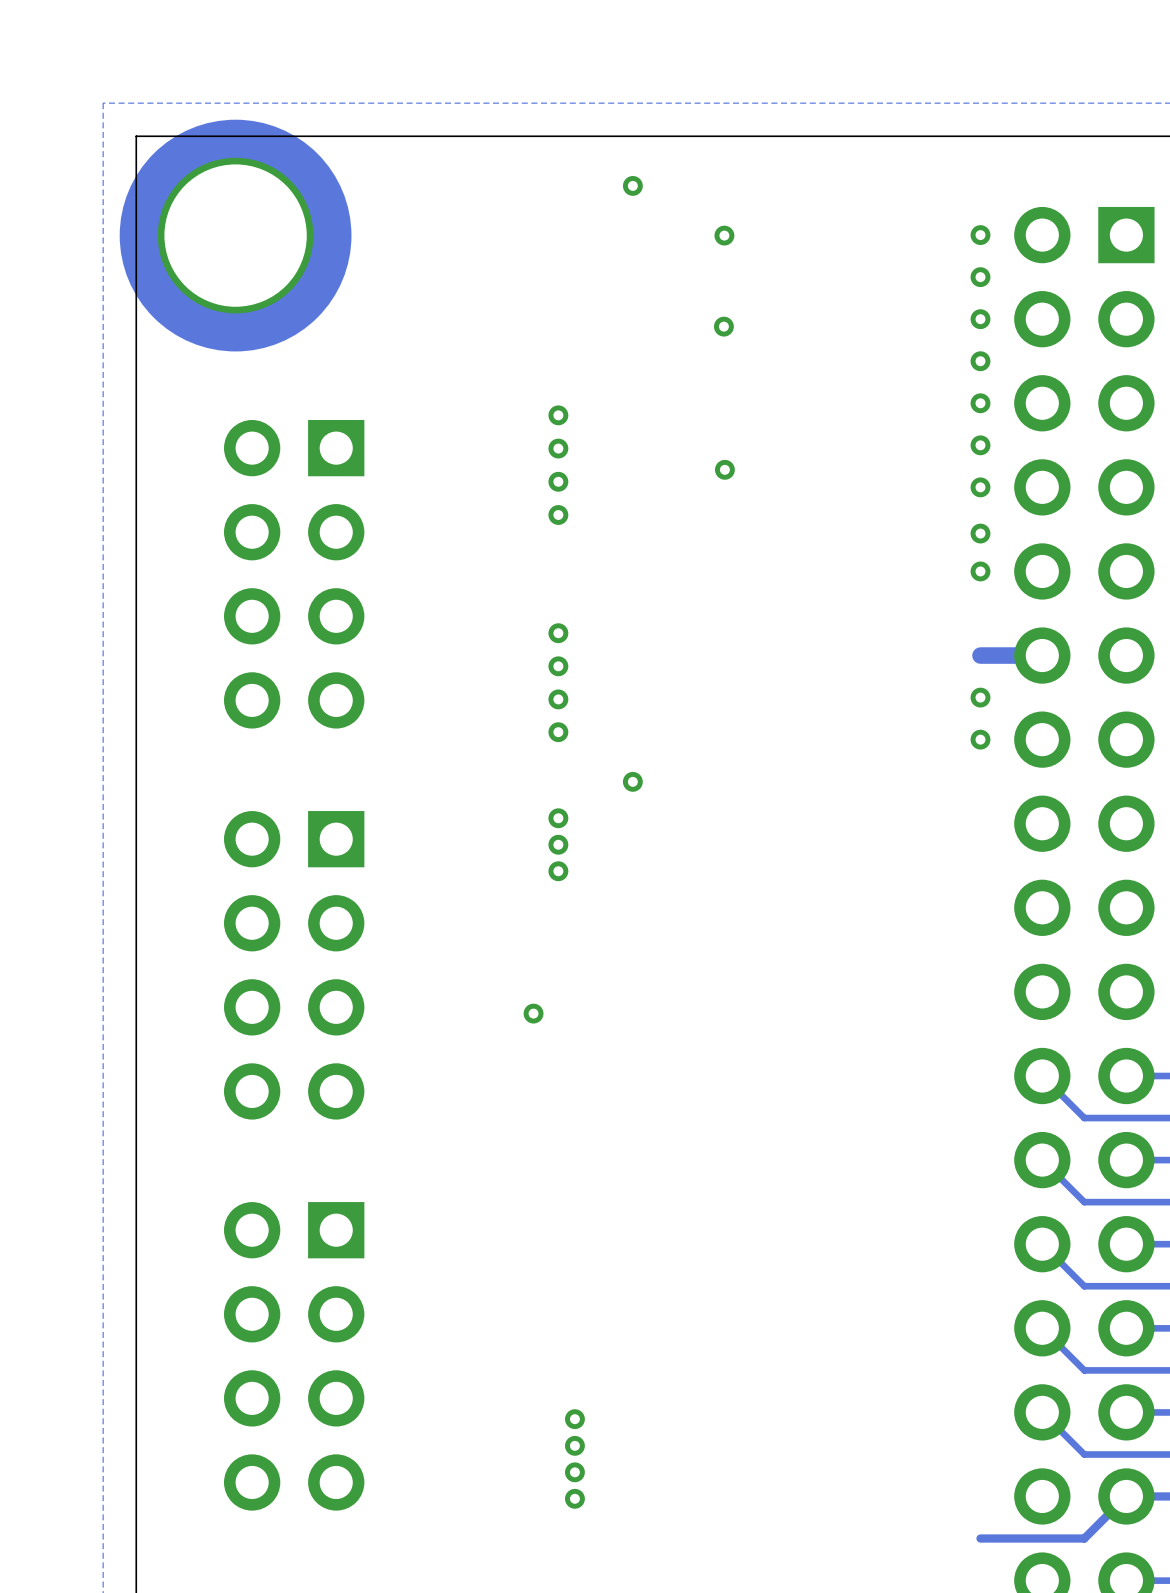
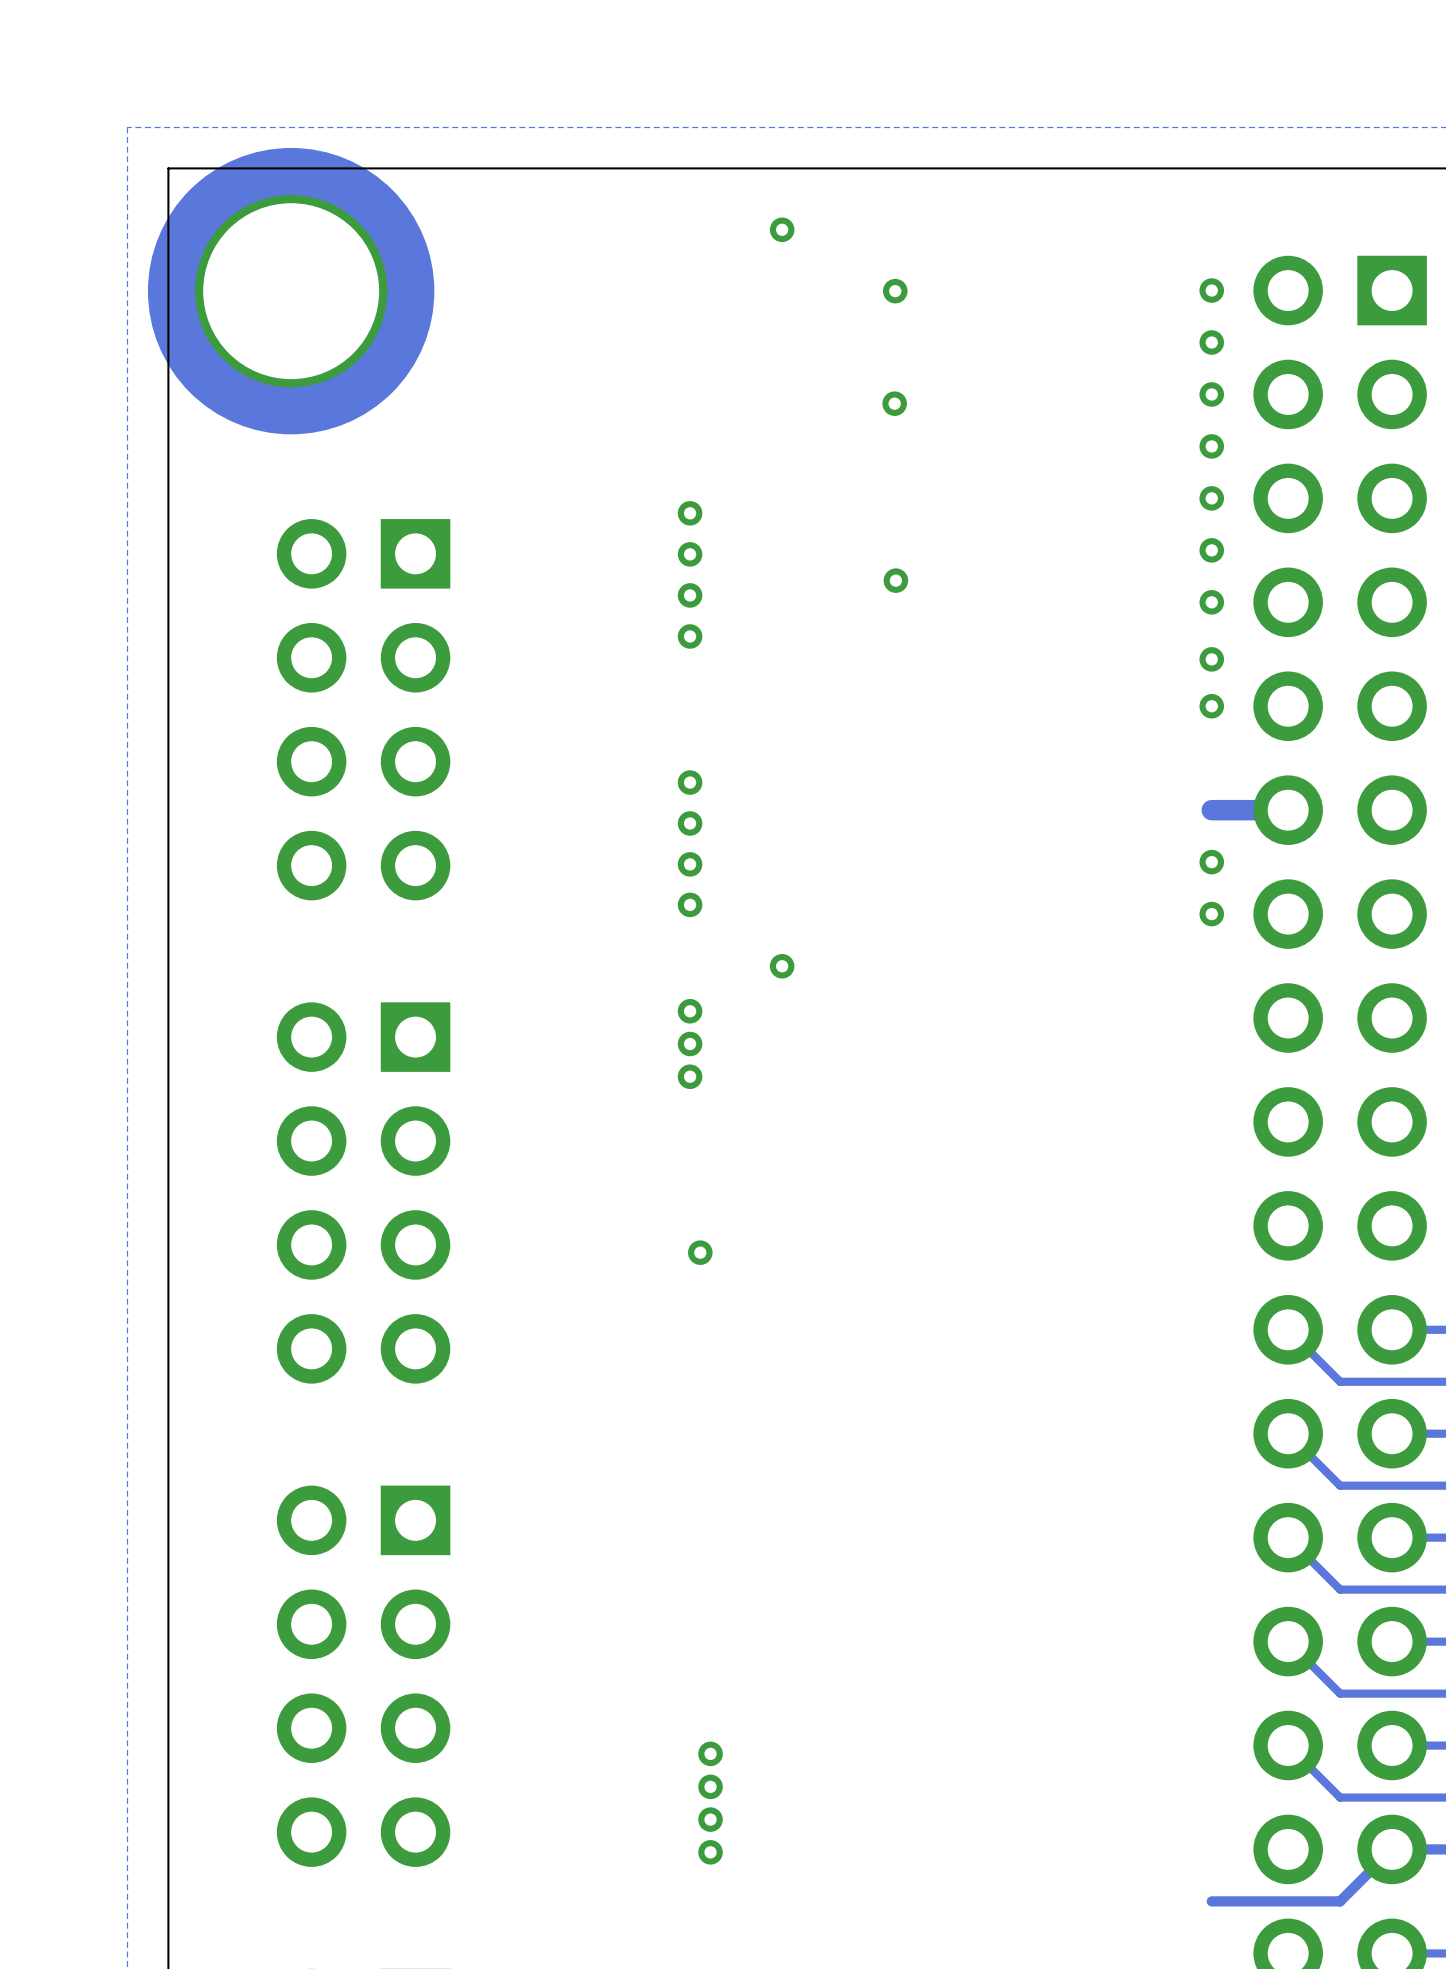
via position: (533, 1013) -> (700, 1252)

